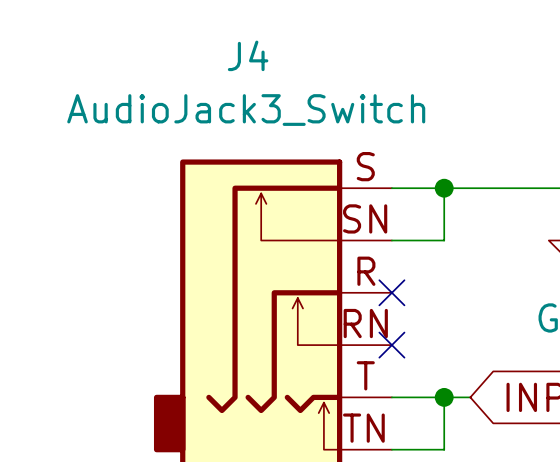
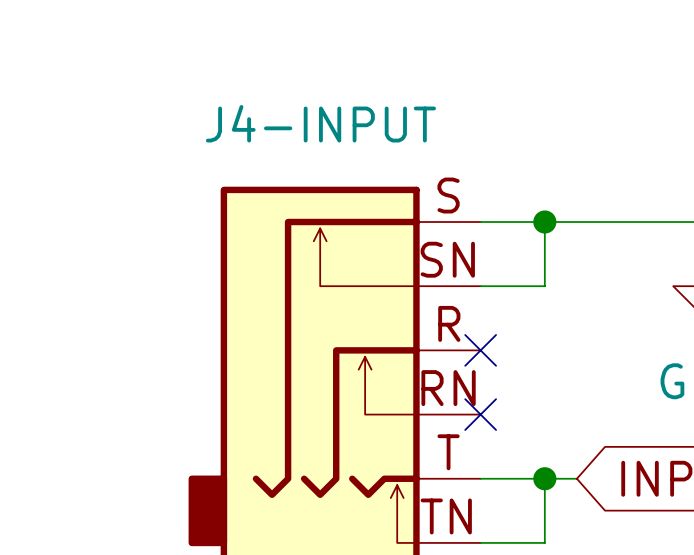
J4 name: J4 (248, 55) -> J4-INPUT (320, 123)
J4 value: AudioJack3_Switch (246, 110) -> none

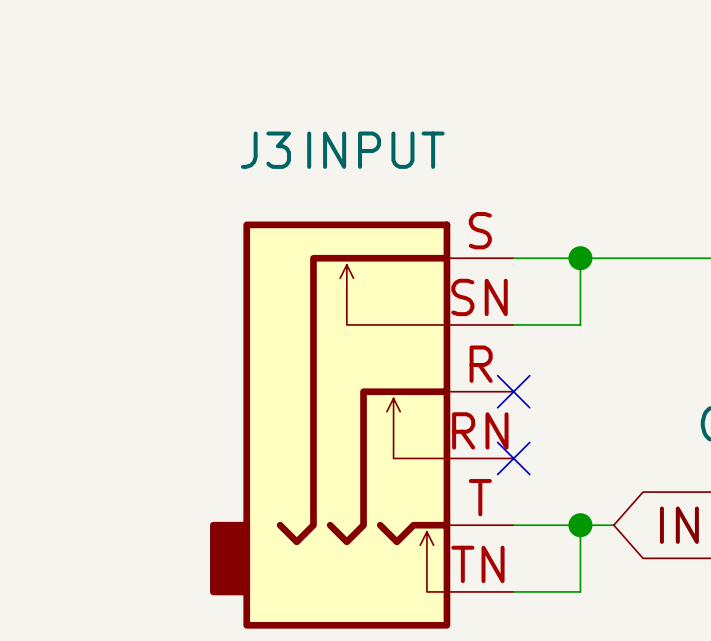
J4-INPUT value: none -> INPUT (375, 150)
J4-INPUT name: J4-INPUT (320, 123) -> J3 (265, 150)

